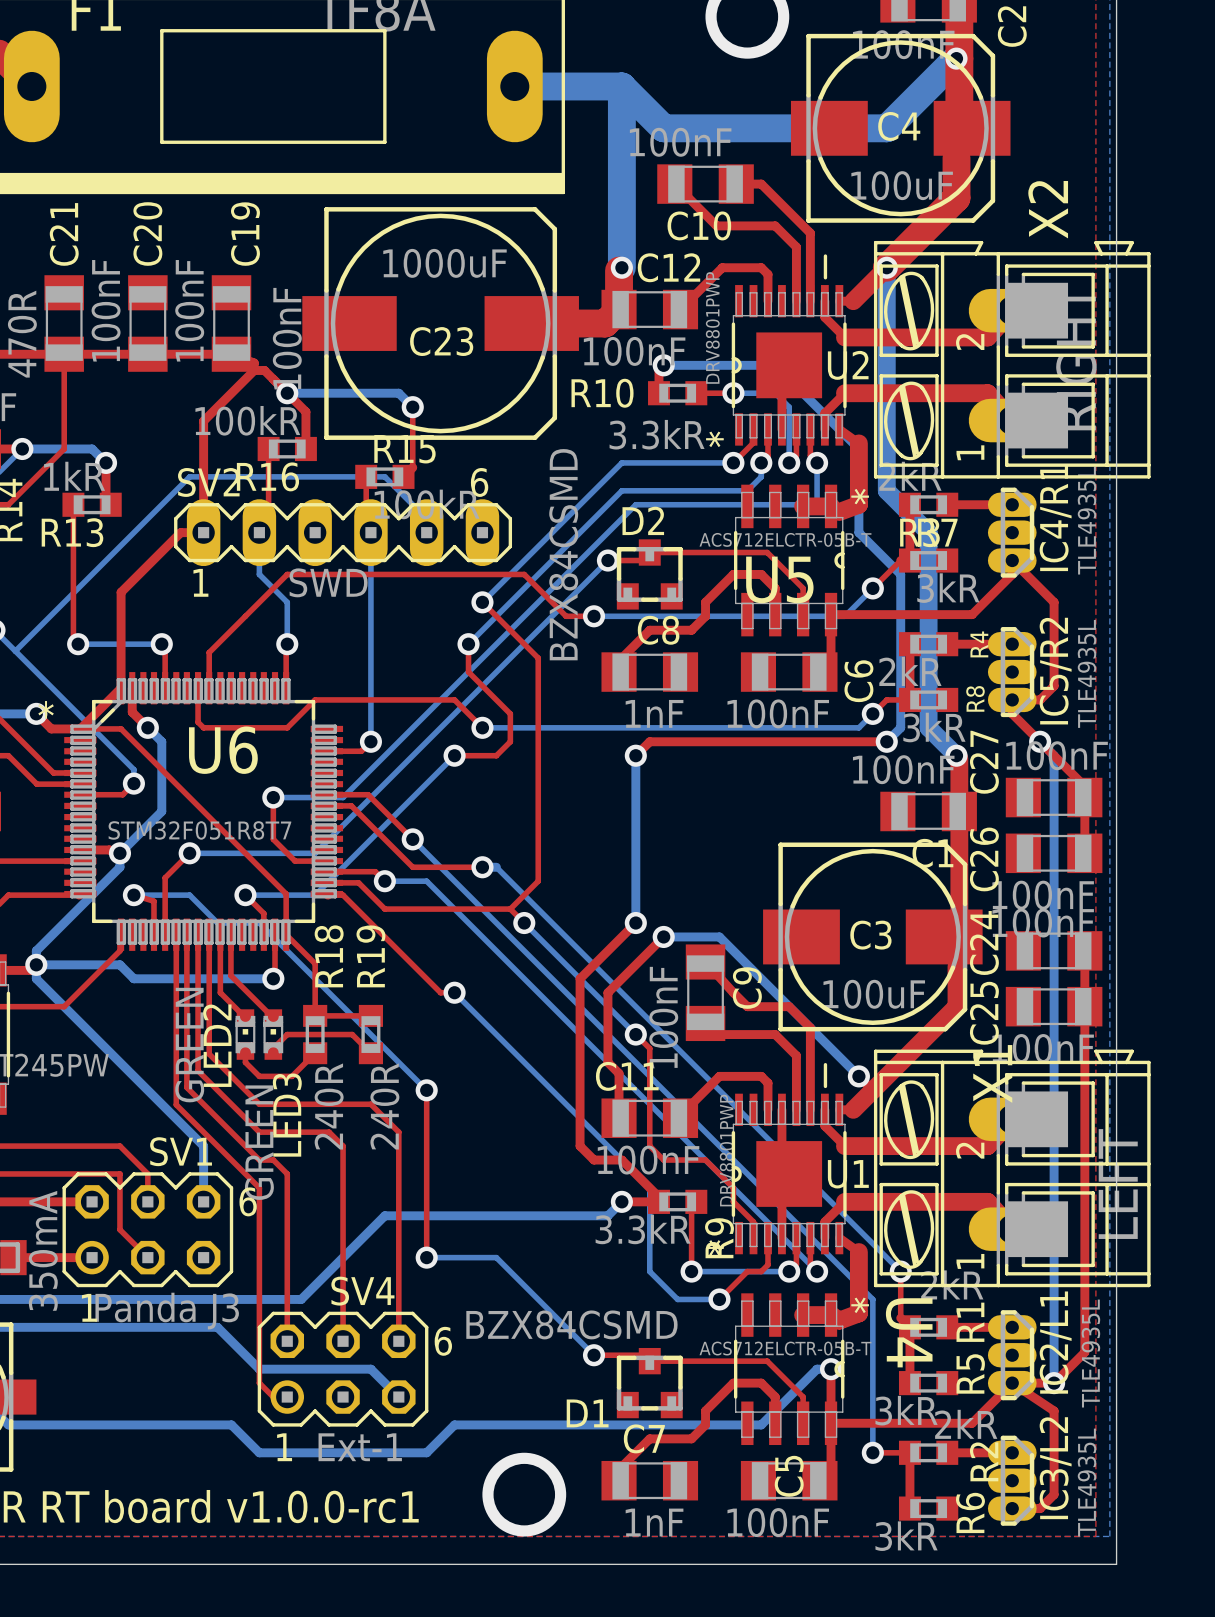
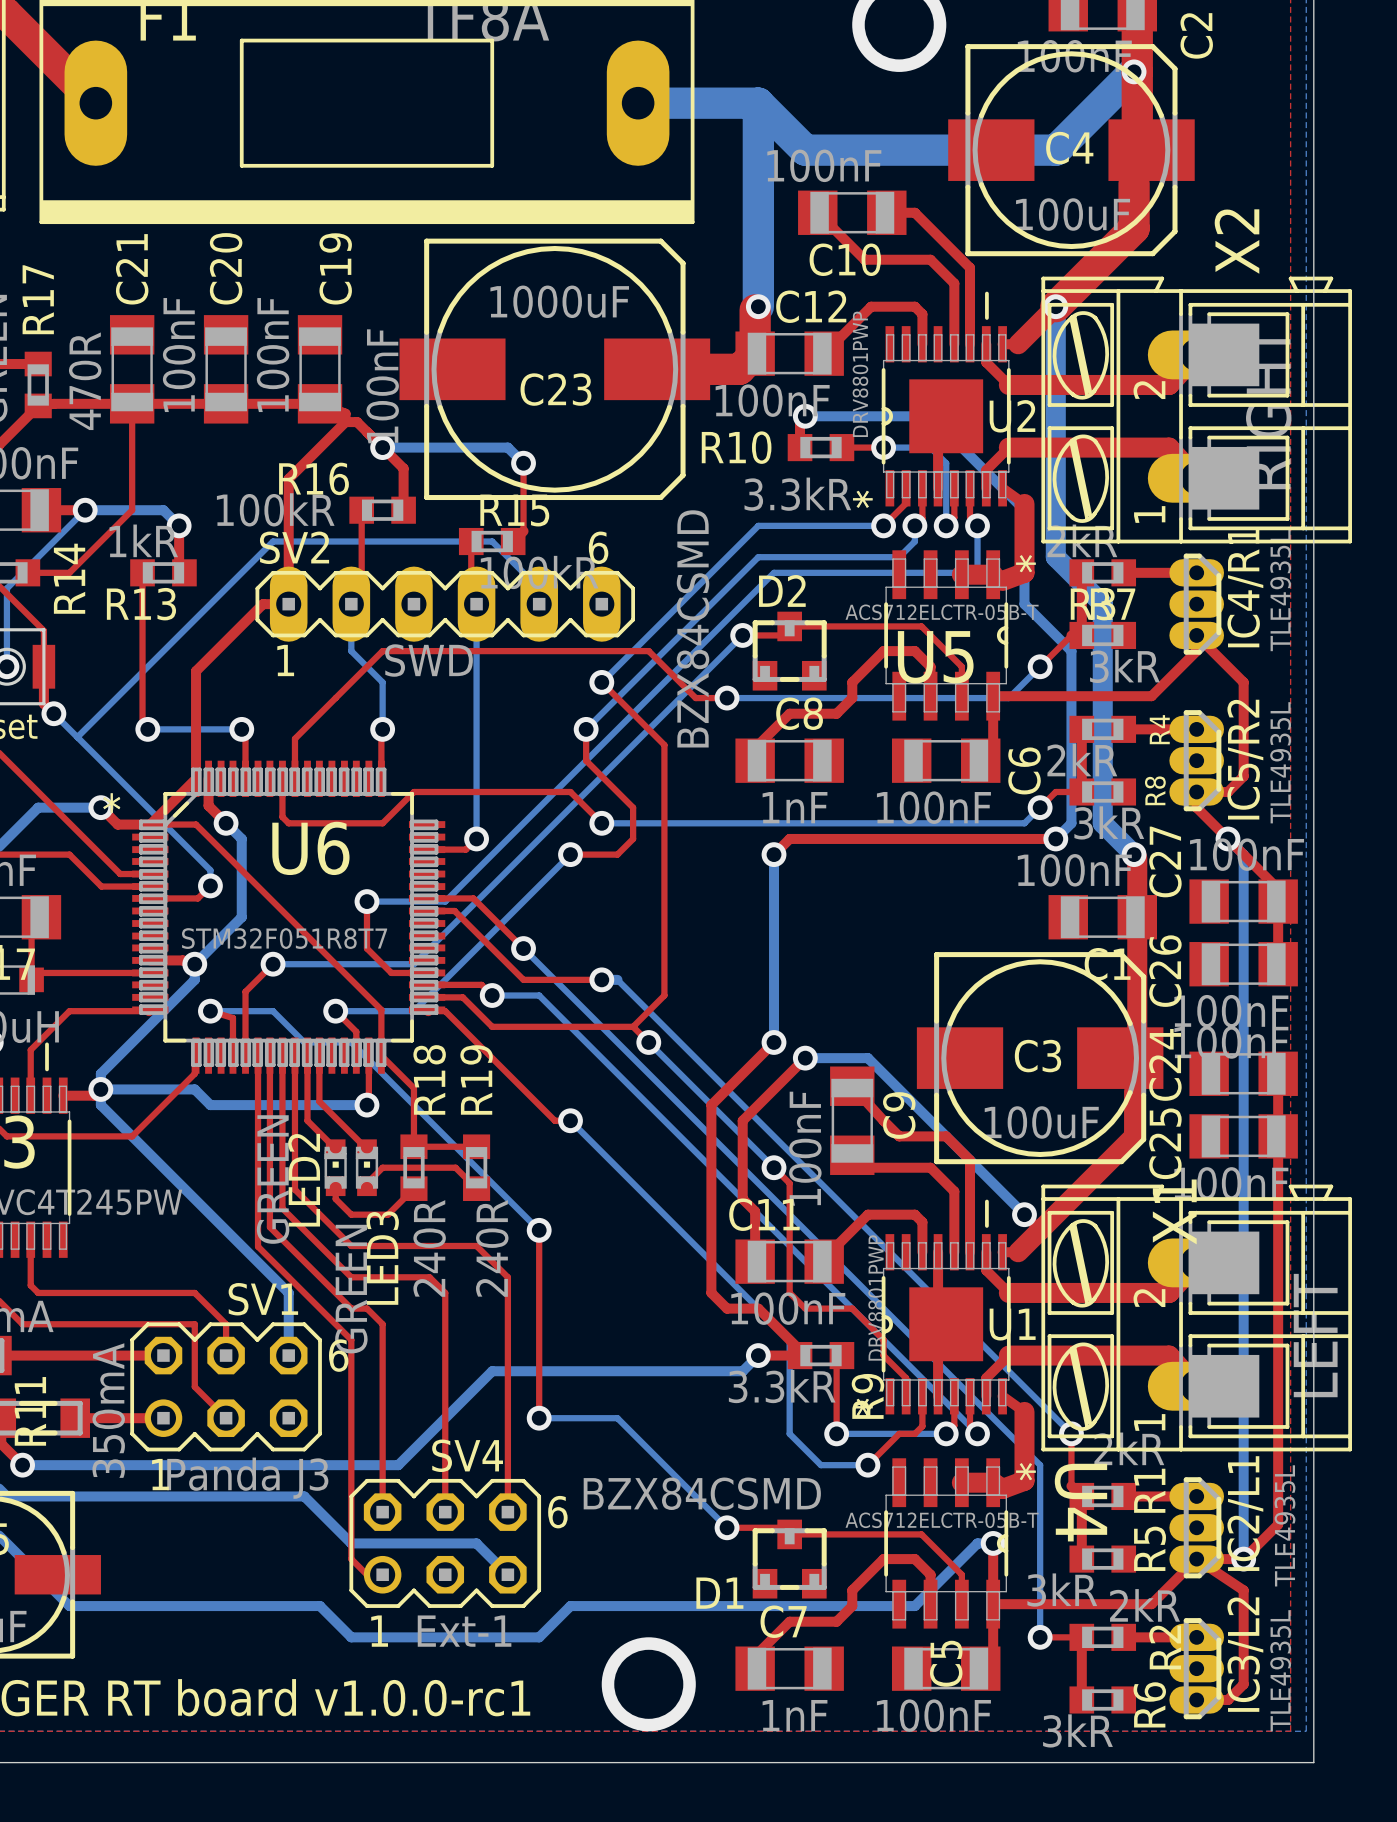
R16 value position: 100kR (247, 420) -> 100kR (275, 509)
R16 name position: R16 (267, 476) -> R16 (313, 478)
R5 value position: 3kR (906, 1410) -> 3kR (1062, 1590)

